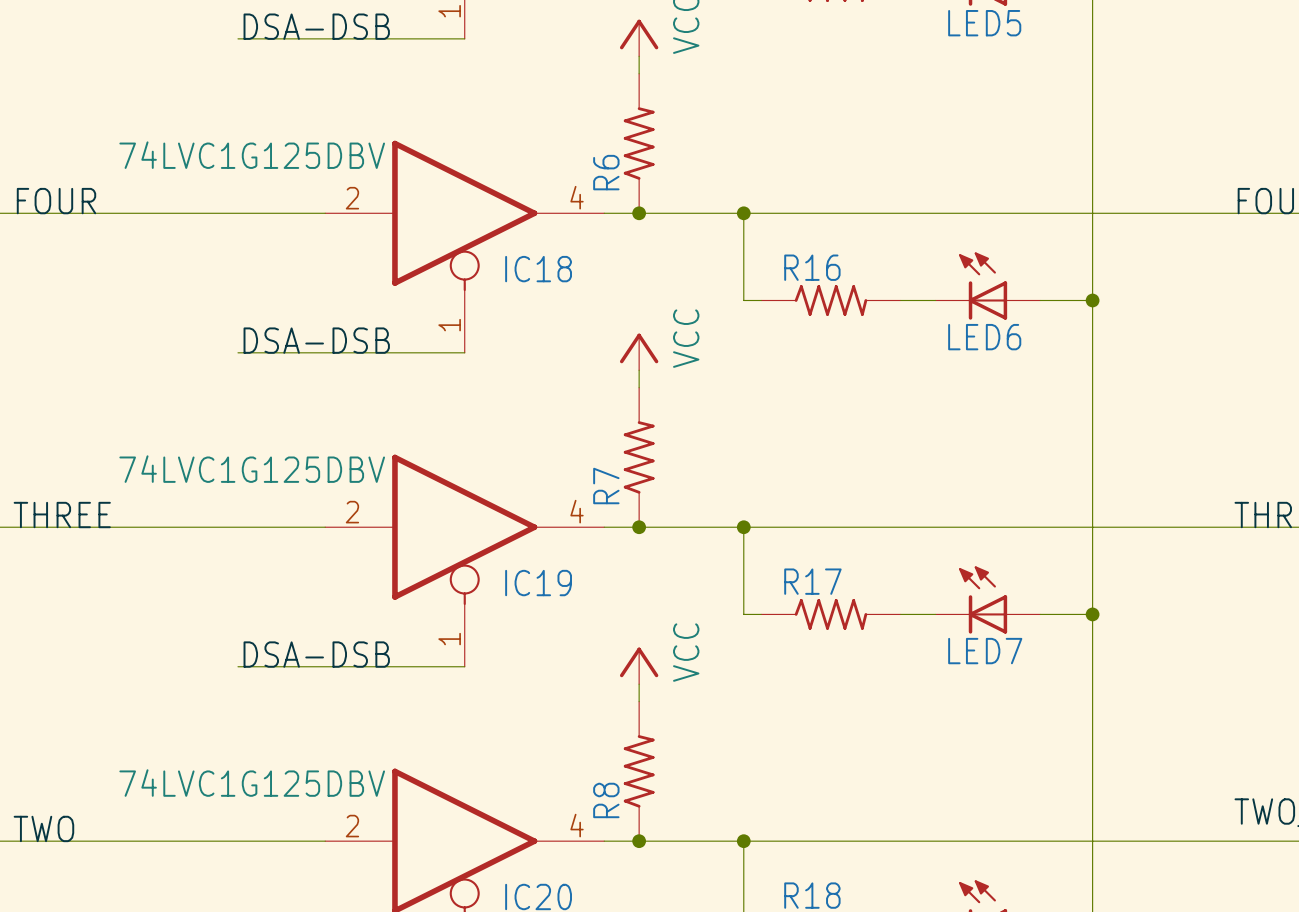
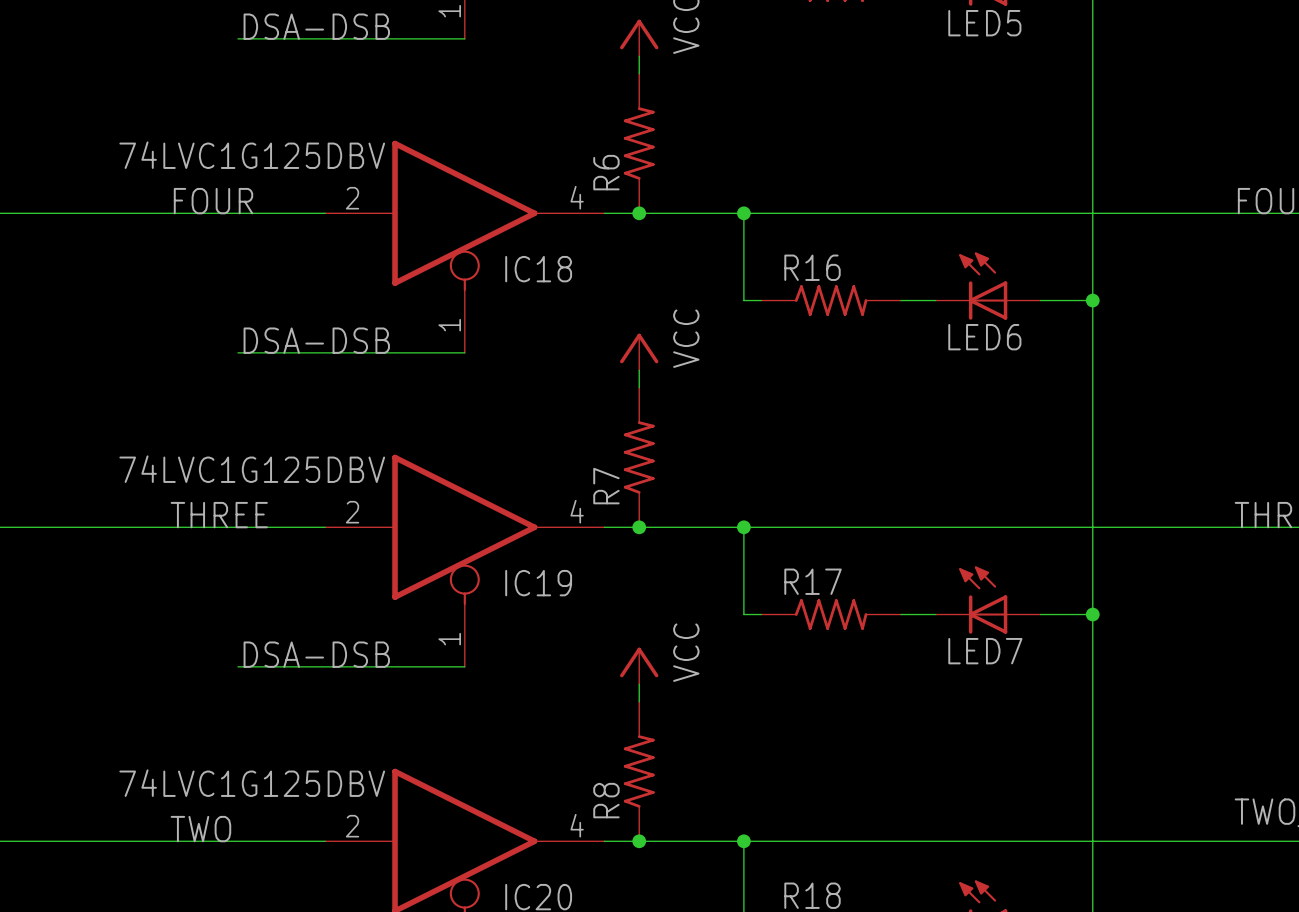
label position: FOUR (56, 201) -> FOUR (213, 201)
label position: THREE (62, 515) -> THREE (219, 515)
label position: TWO (43, 828) -> TWO (200, 829)

